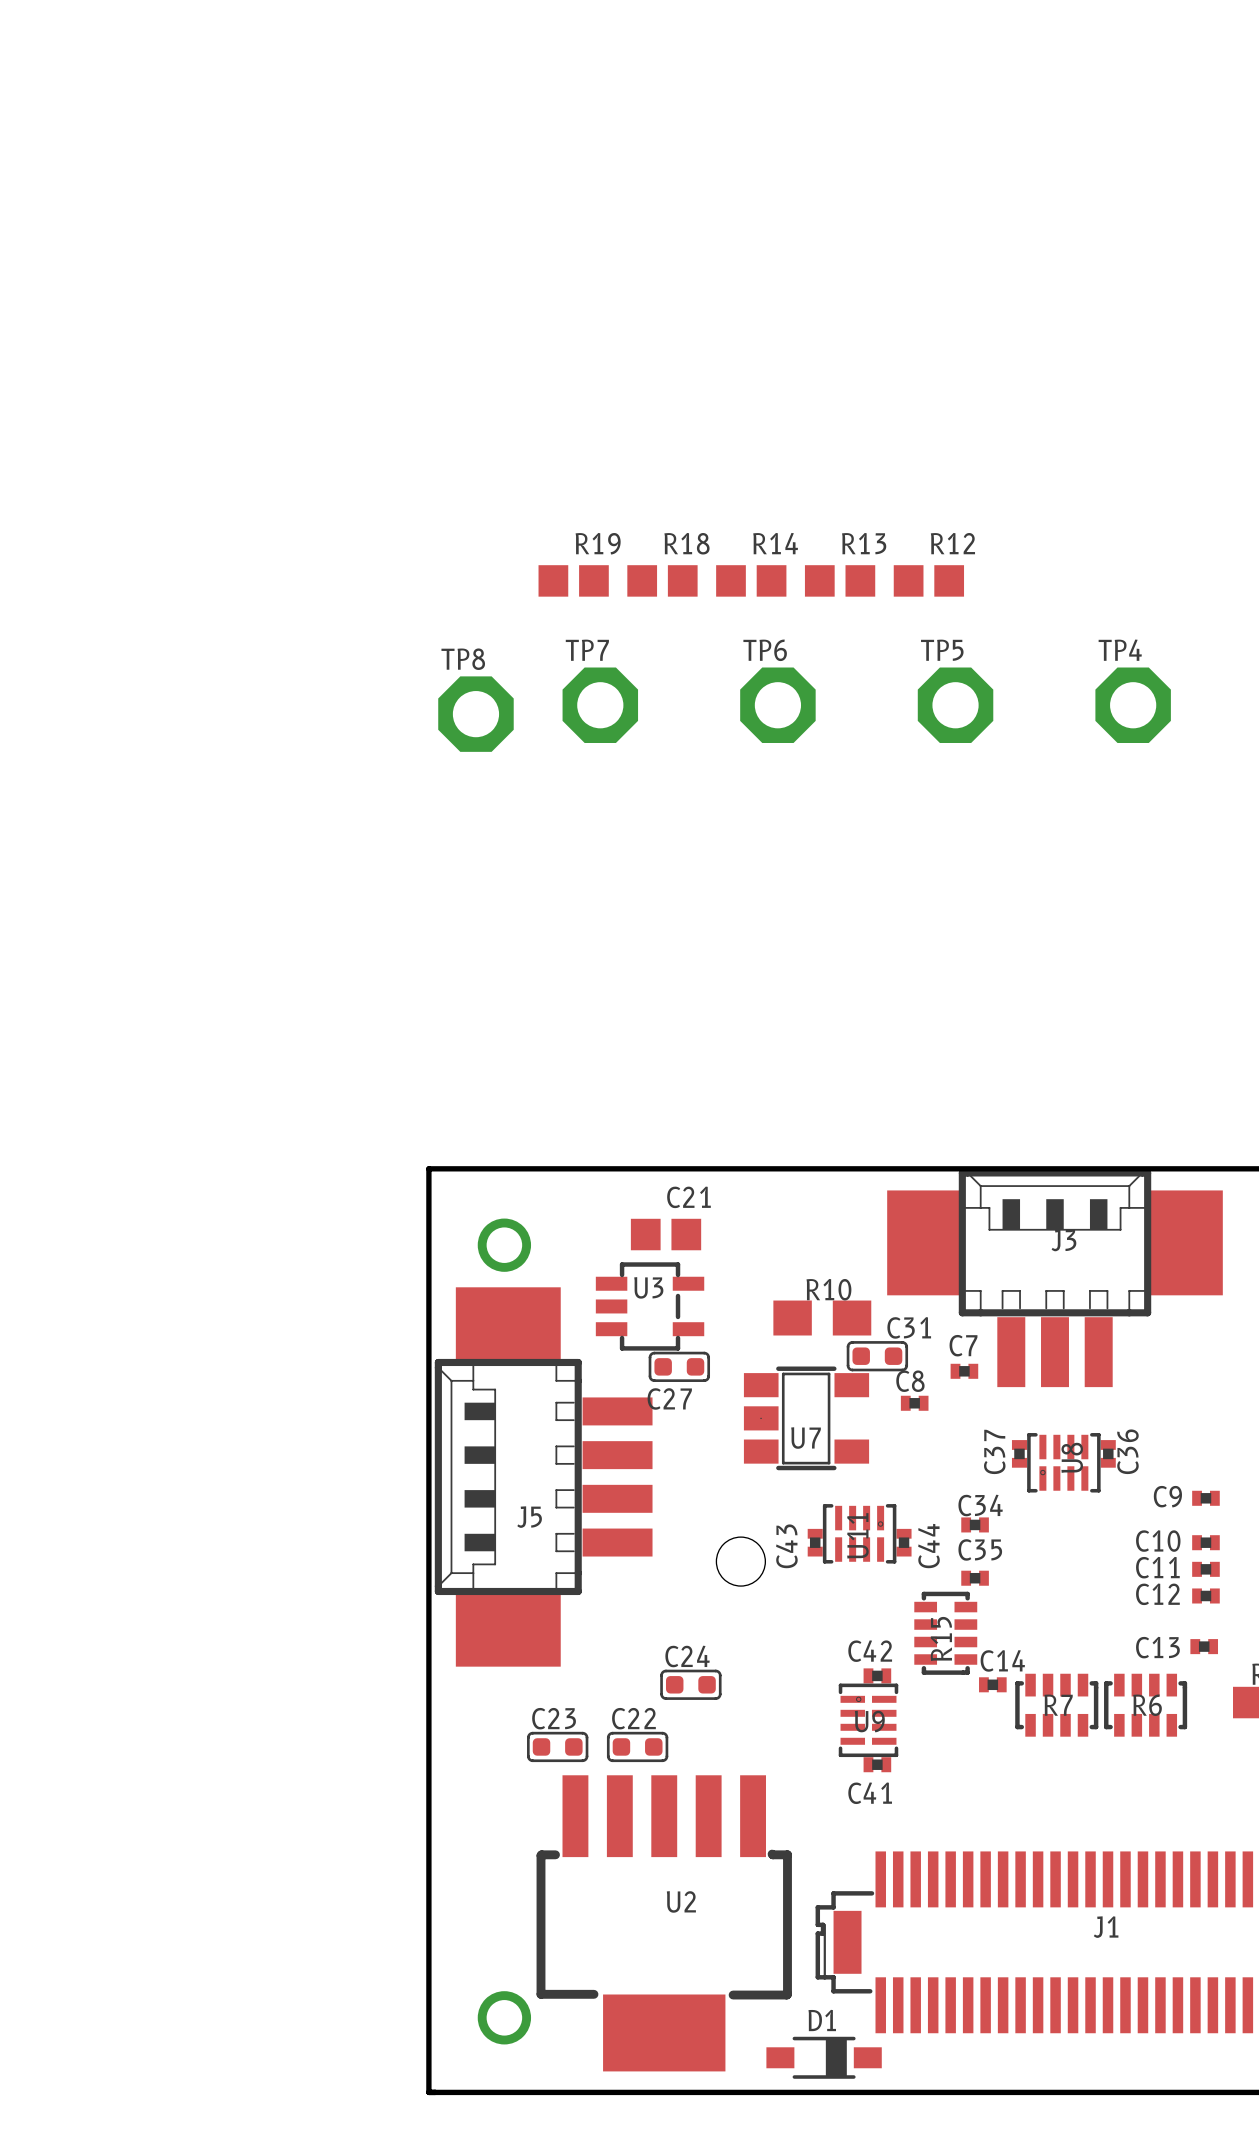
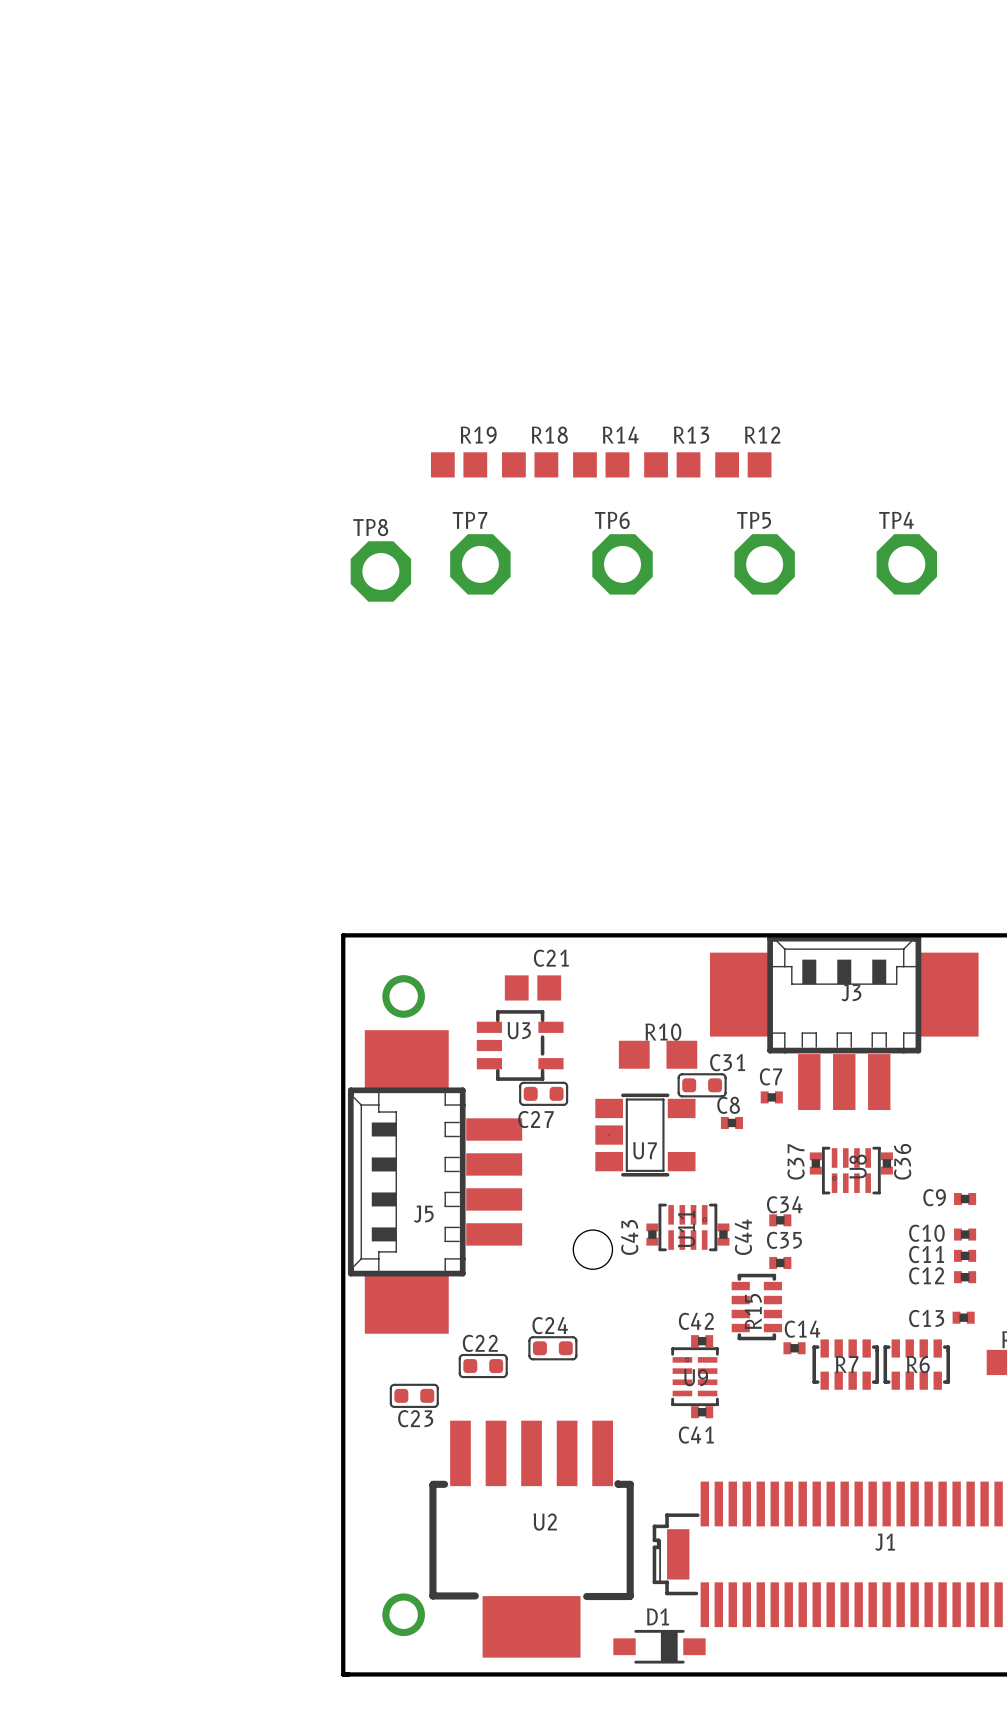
C23 name position: C23 (554, 1718) -> C23 (415, 1418)
C23 position: (557, 1746) -> (414, 1395)
C22 position: (637, 1746) -> (483, 1366)

